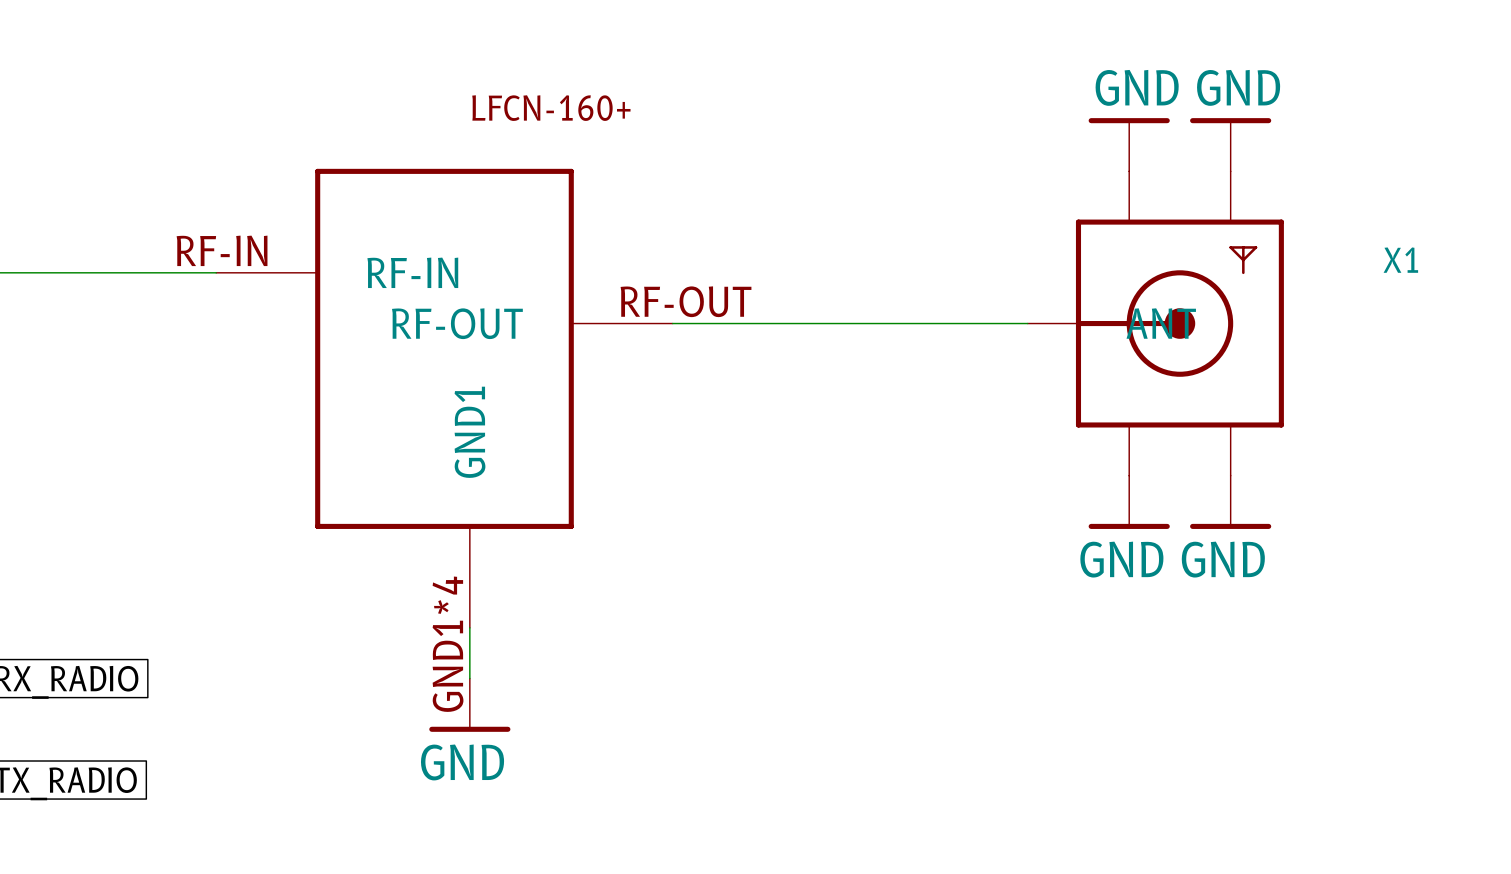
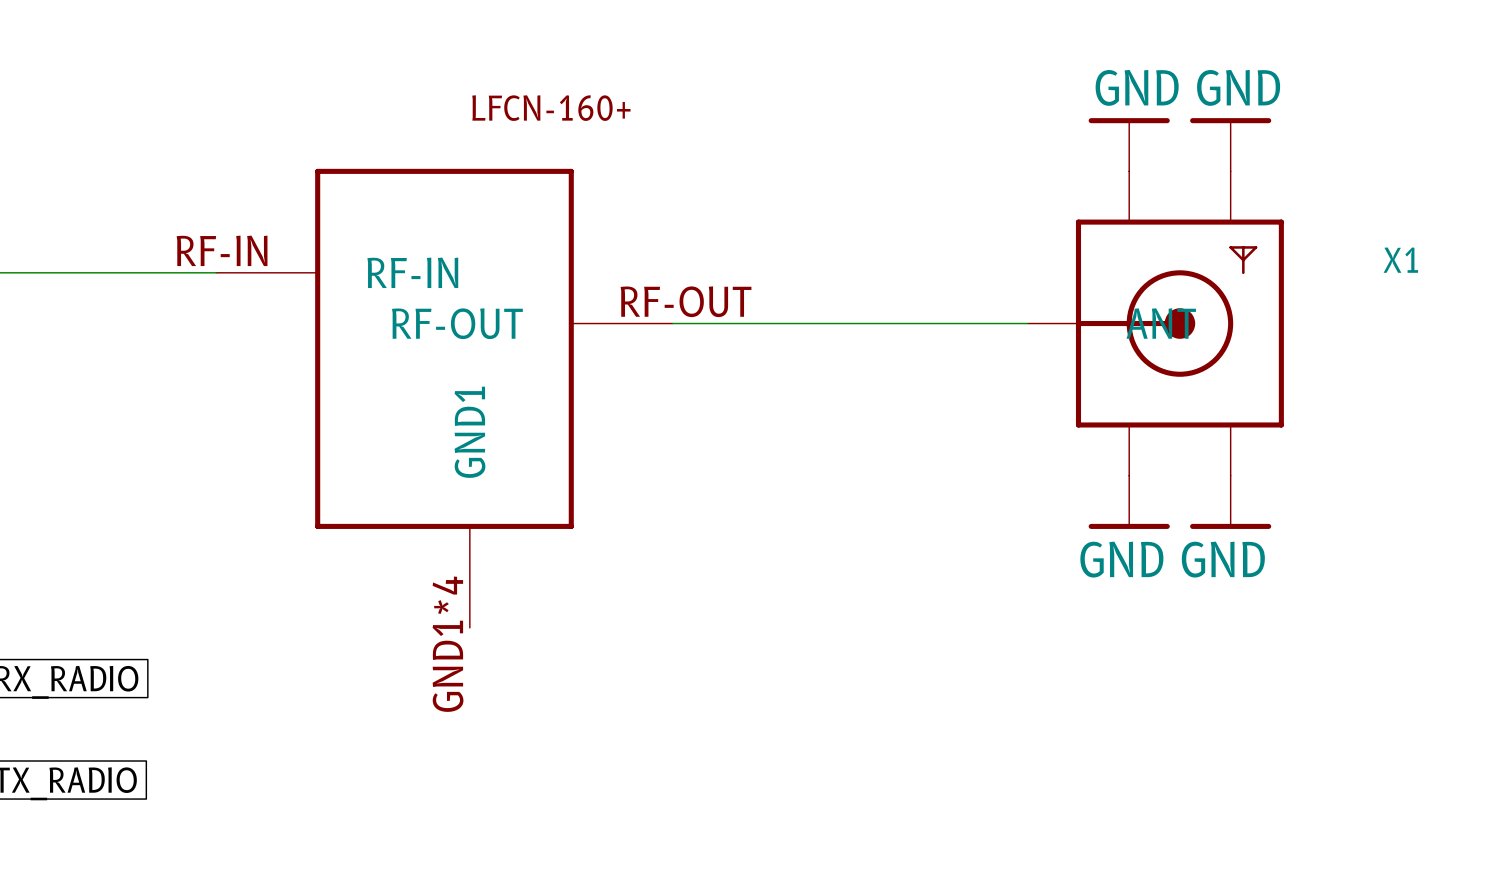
wire: (469, 627) (469, 678) -> none
power symbol: GND (469, 705) -> none

